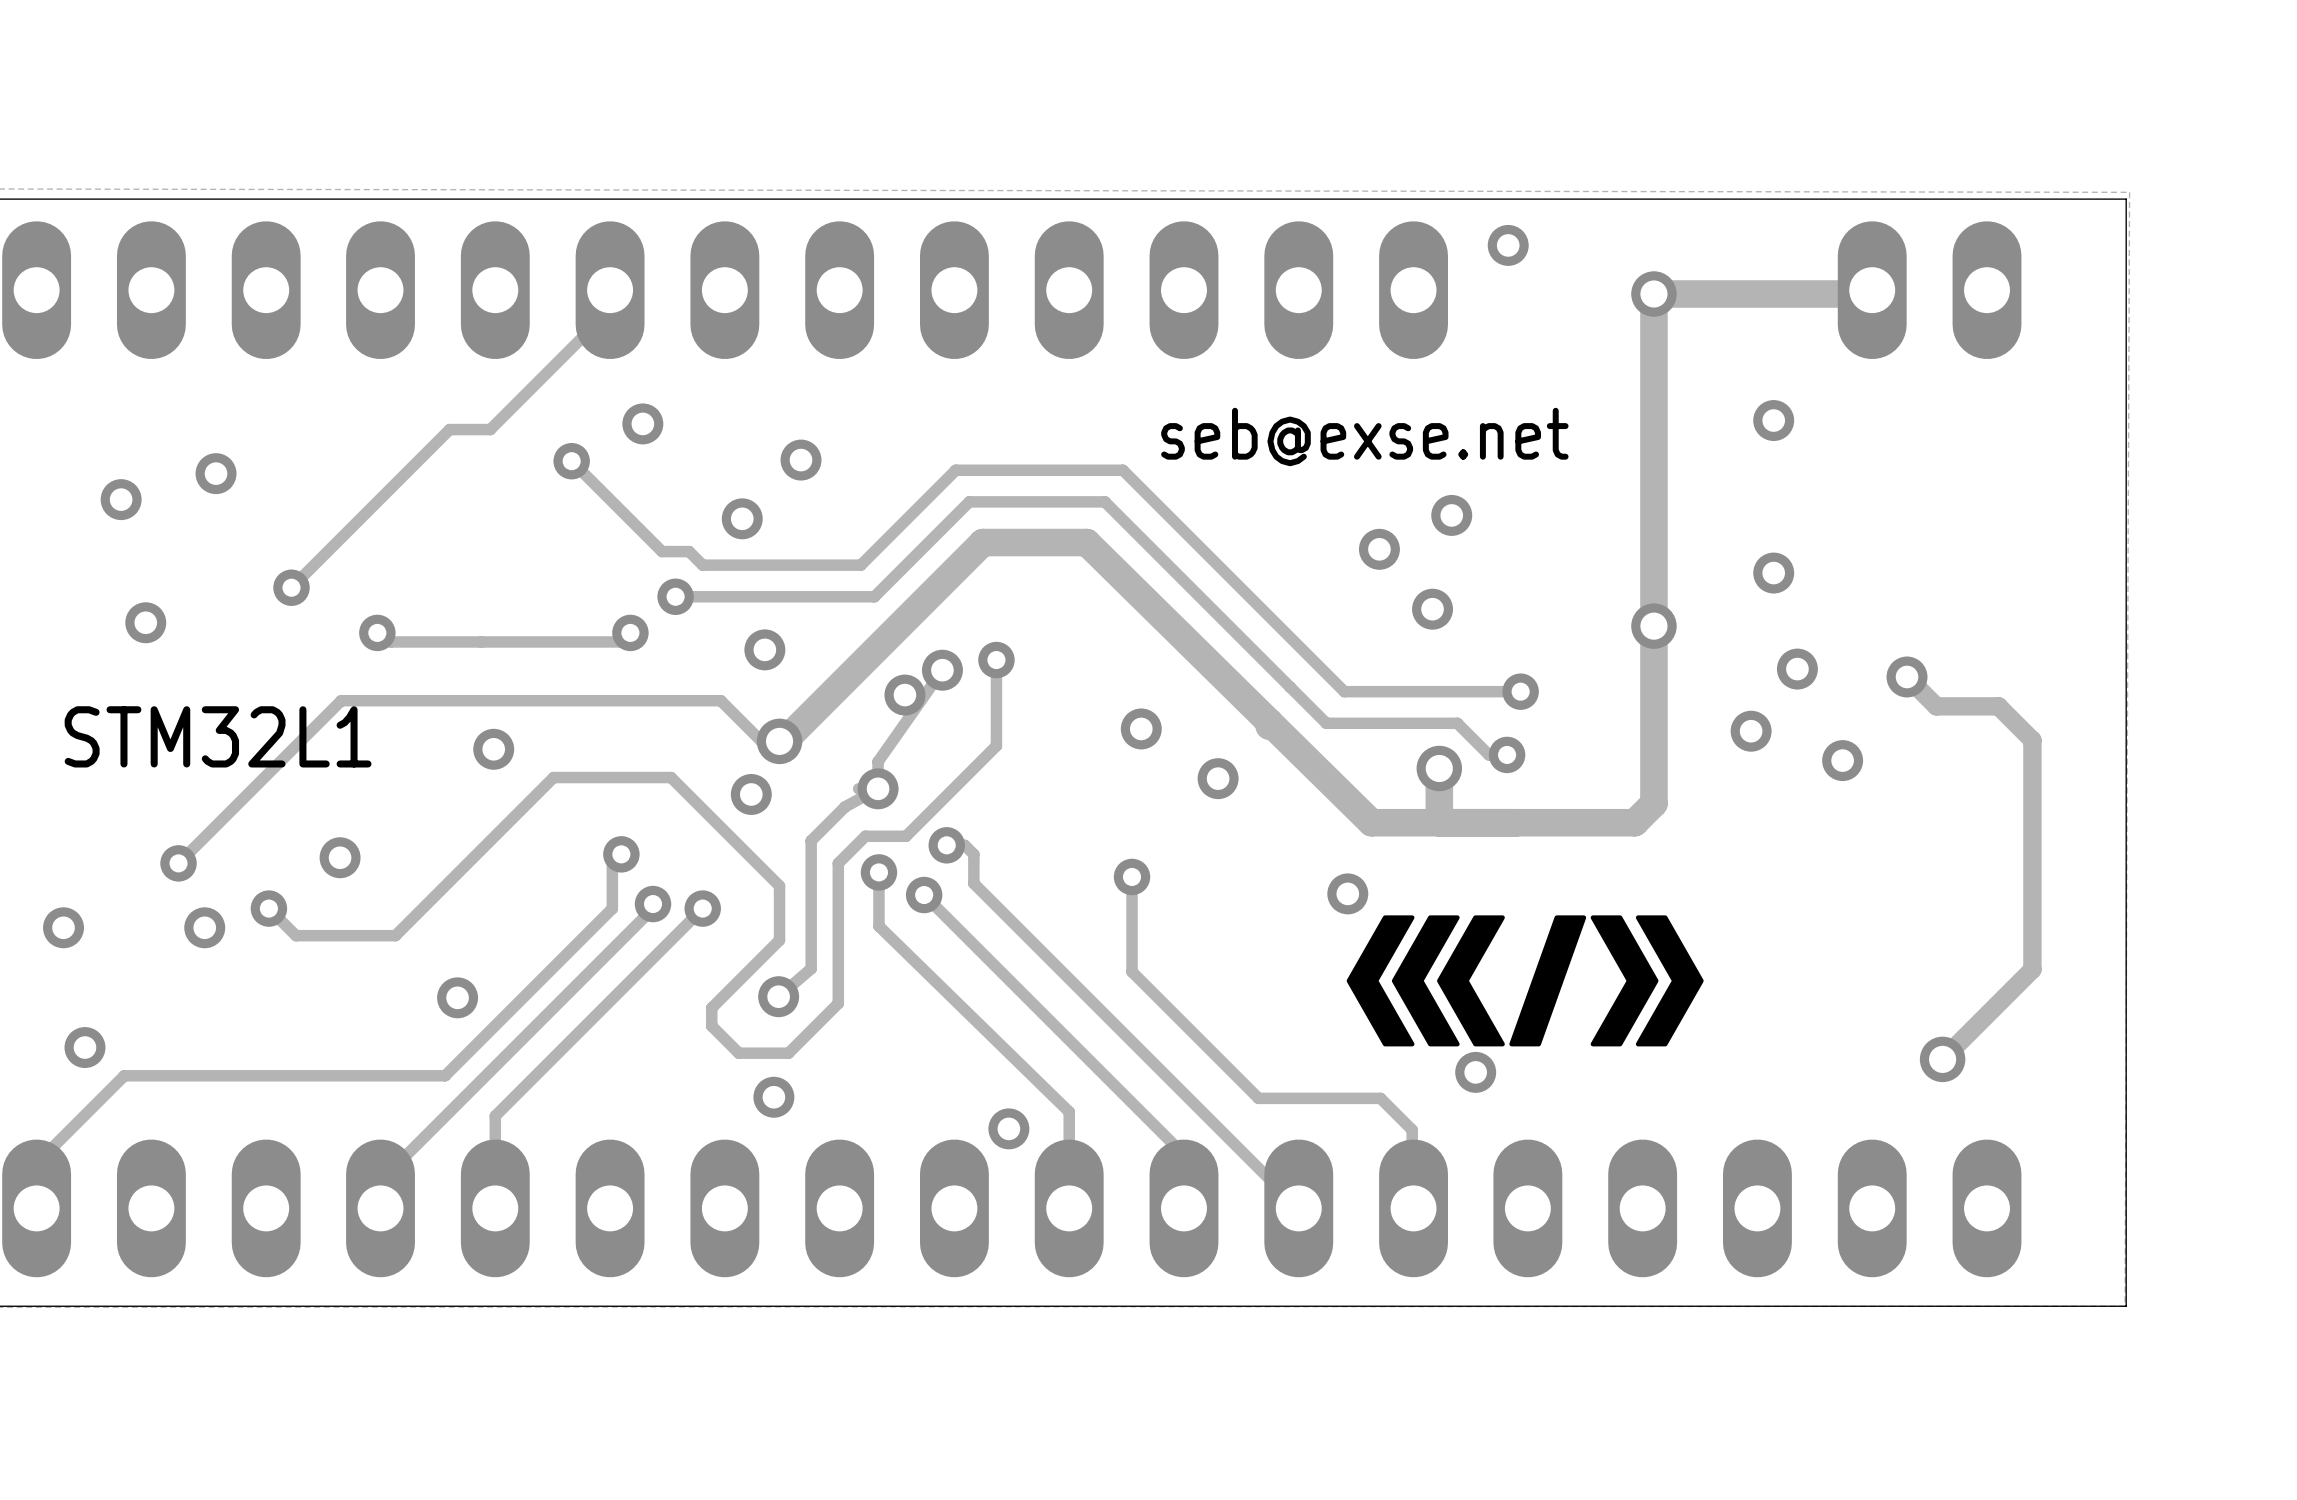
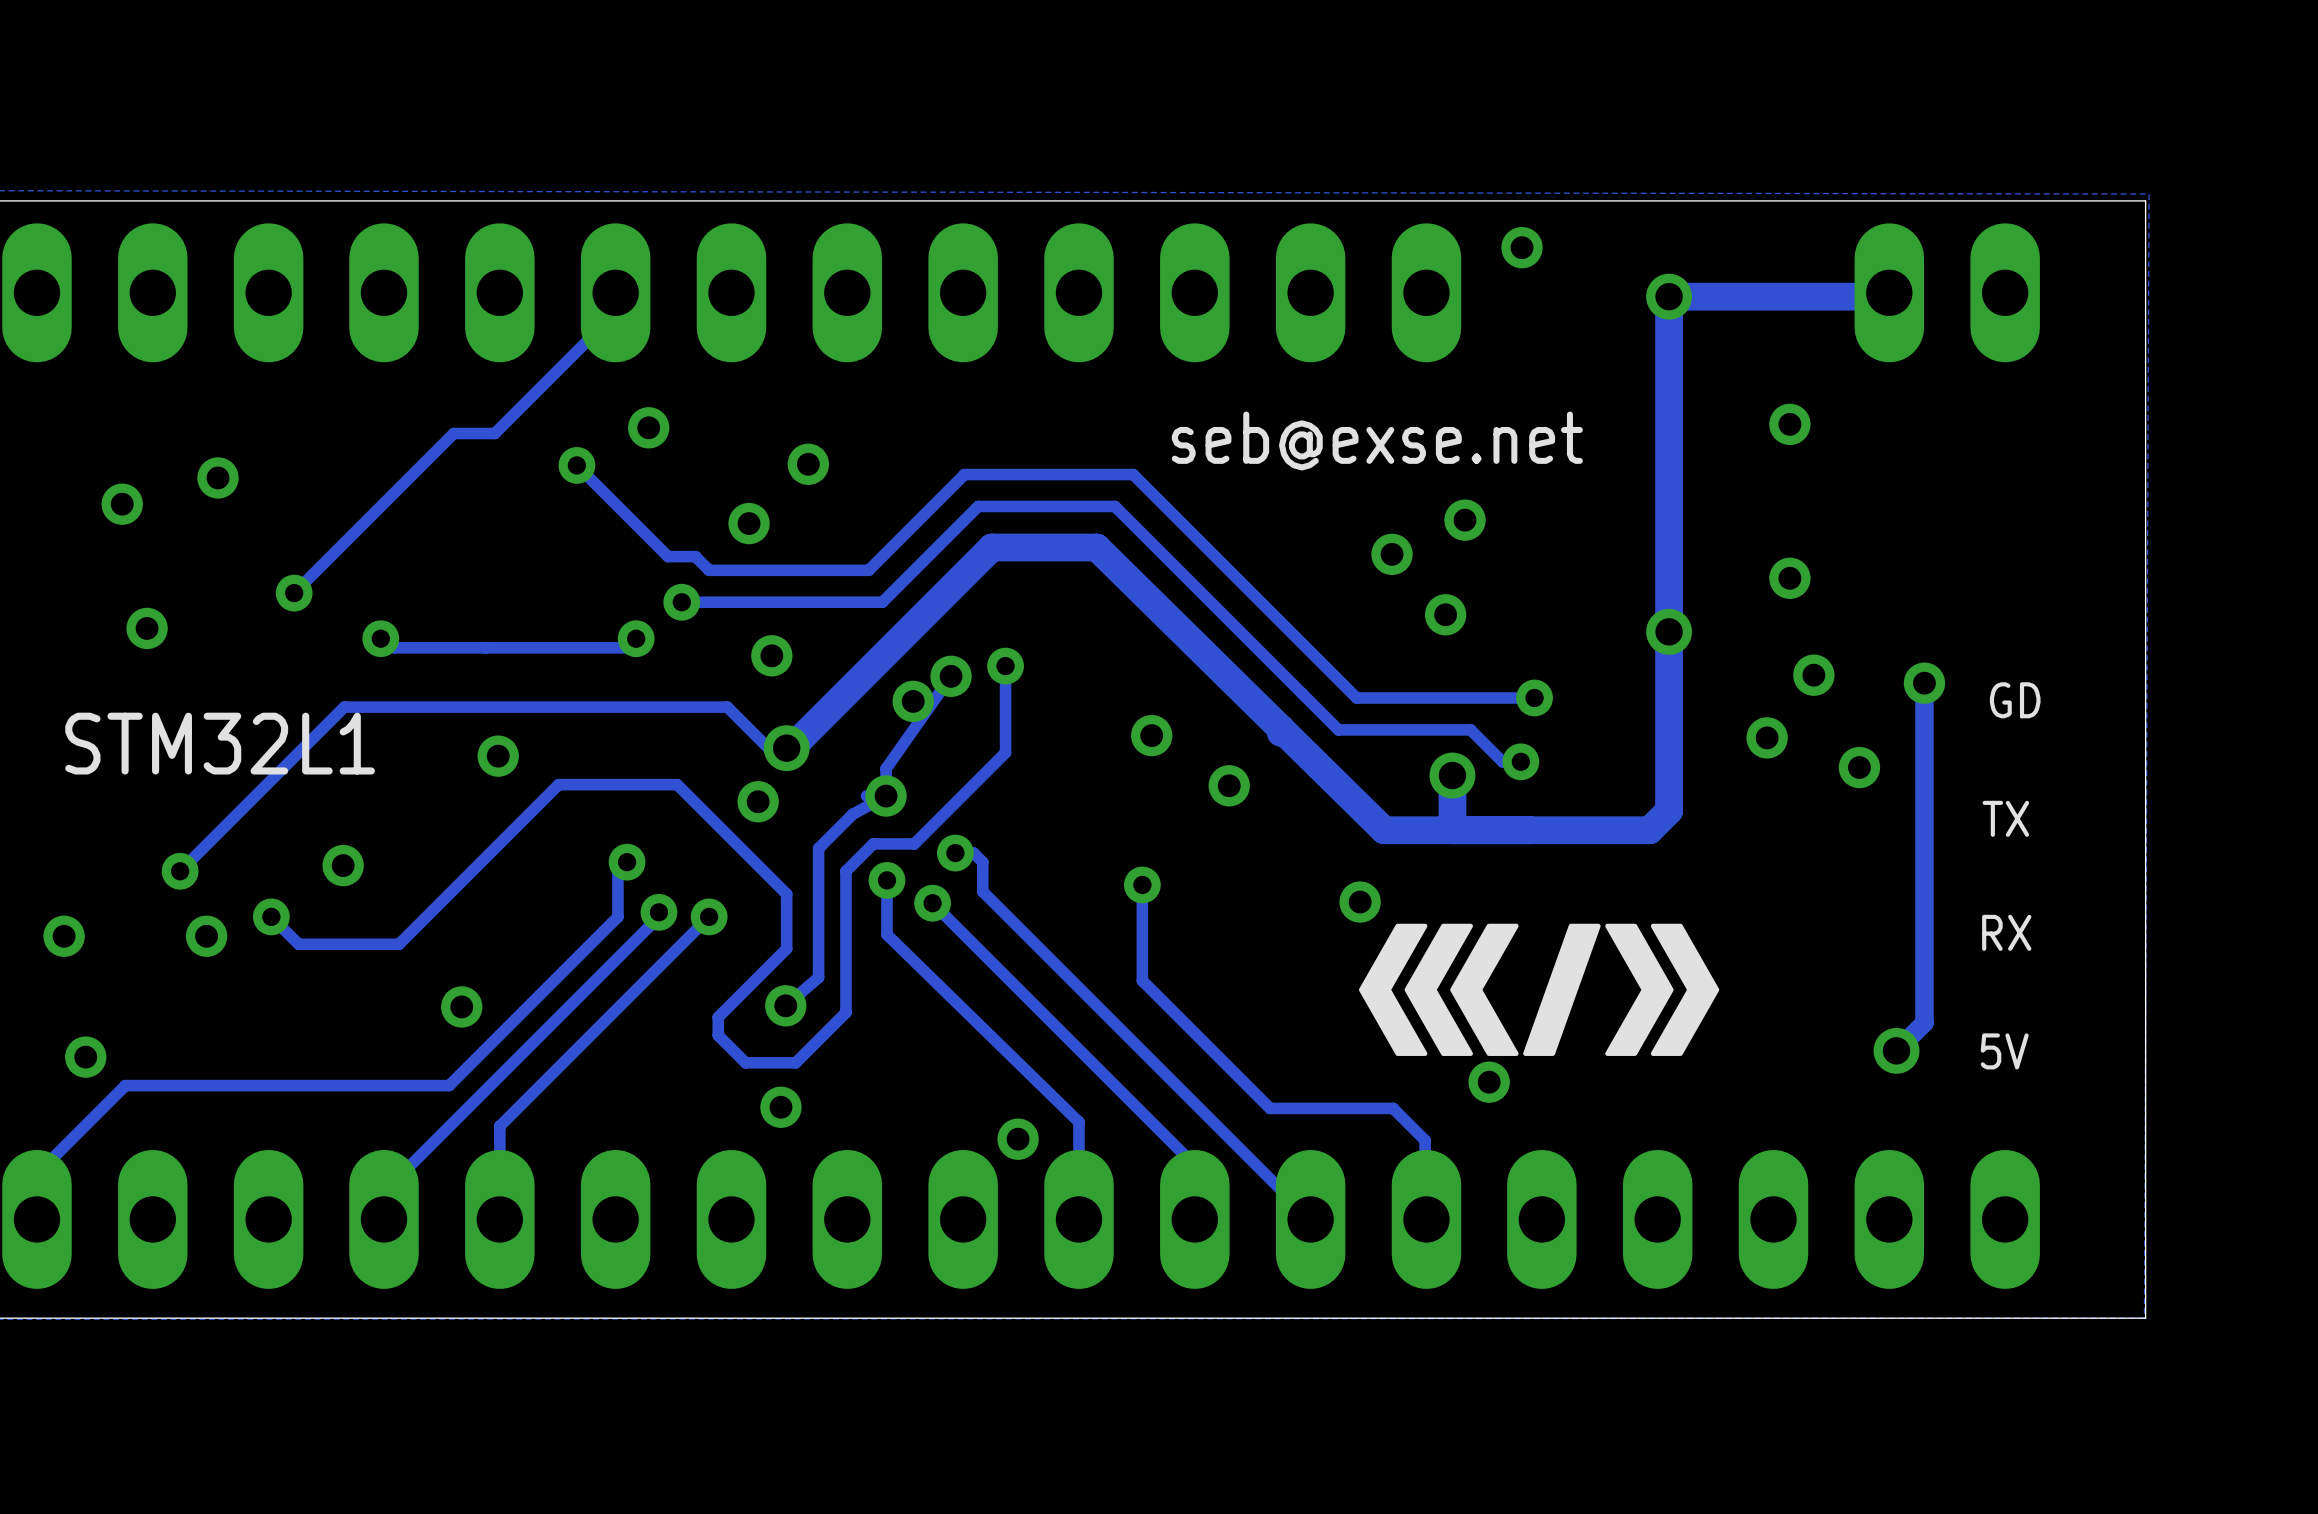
track: (1907, 676) (1936, 706) (1998, 706) (2032, 740) (2032, 969) (1942, 1059) -> (1924, 683) (1924, 1022) (1896, 1050)
text: none -> GD (2015, 700)
text: none -> TX (2005, 818)
text: none -> RX (2006, 932)
text: none -> 5V (2004, 1051)
via position: (1942, 1059) -> (1896, 1050)

